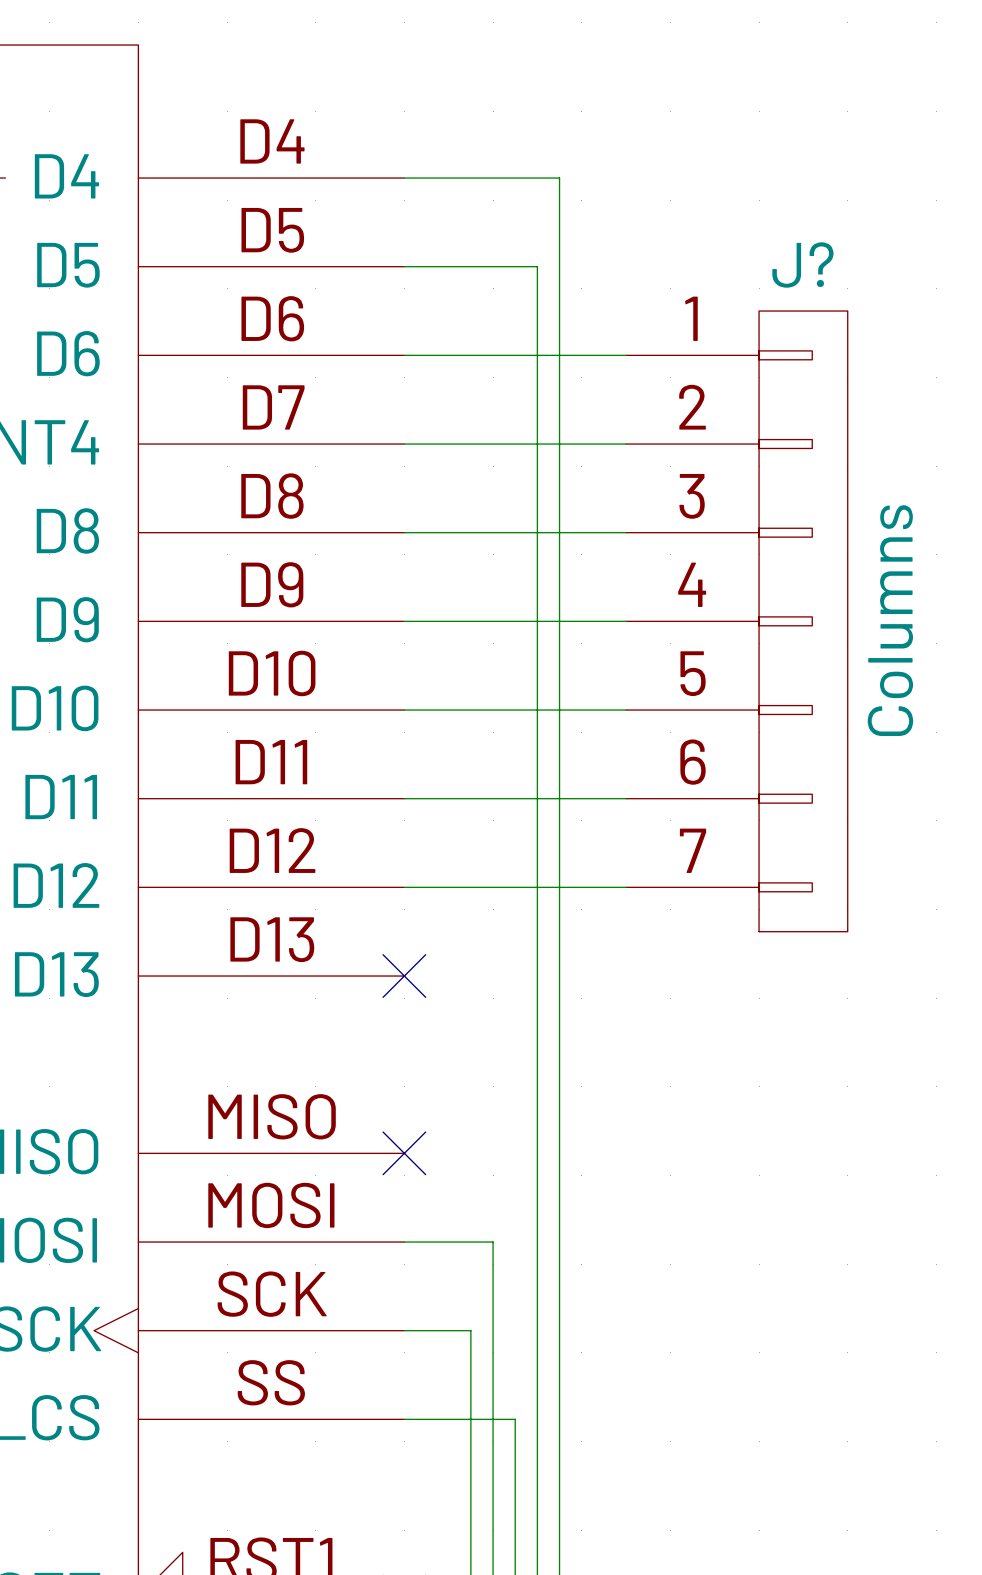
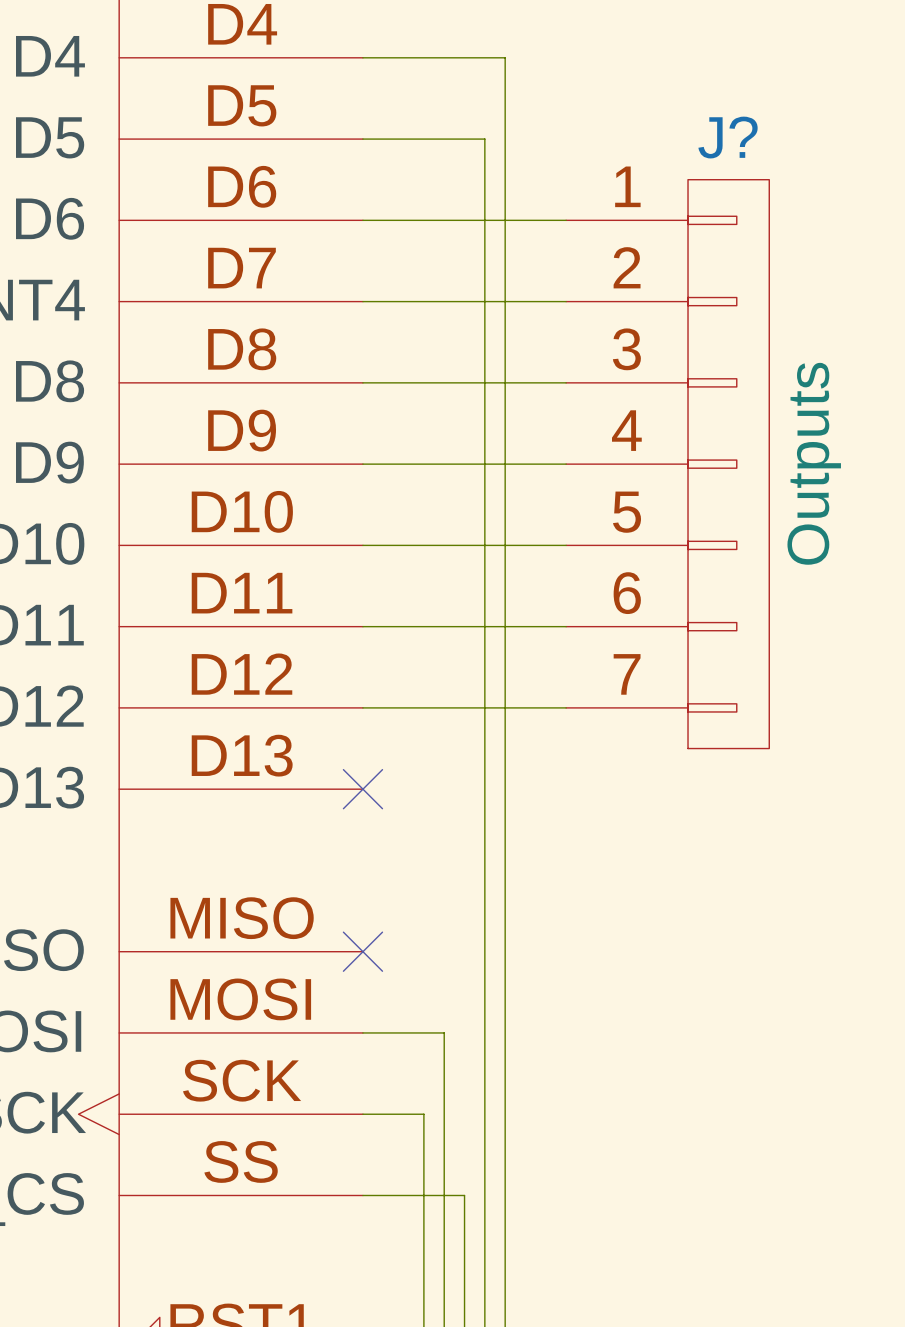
J? value: Columns (890, 620) -> Outputs (814, 463)

